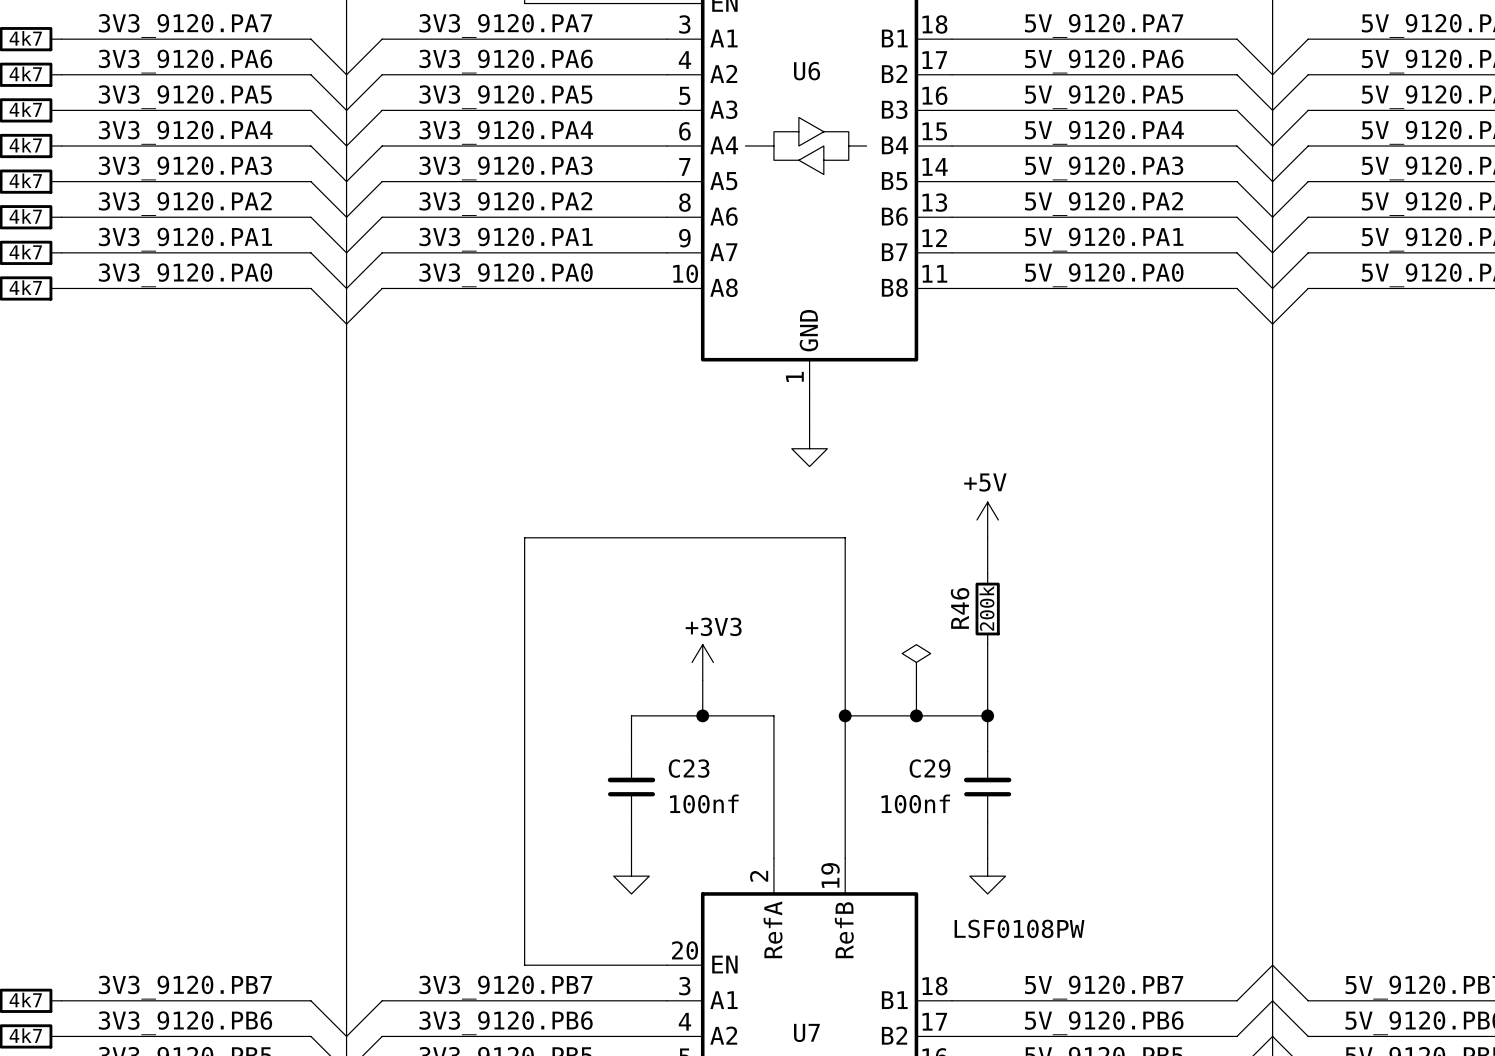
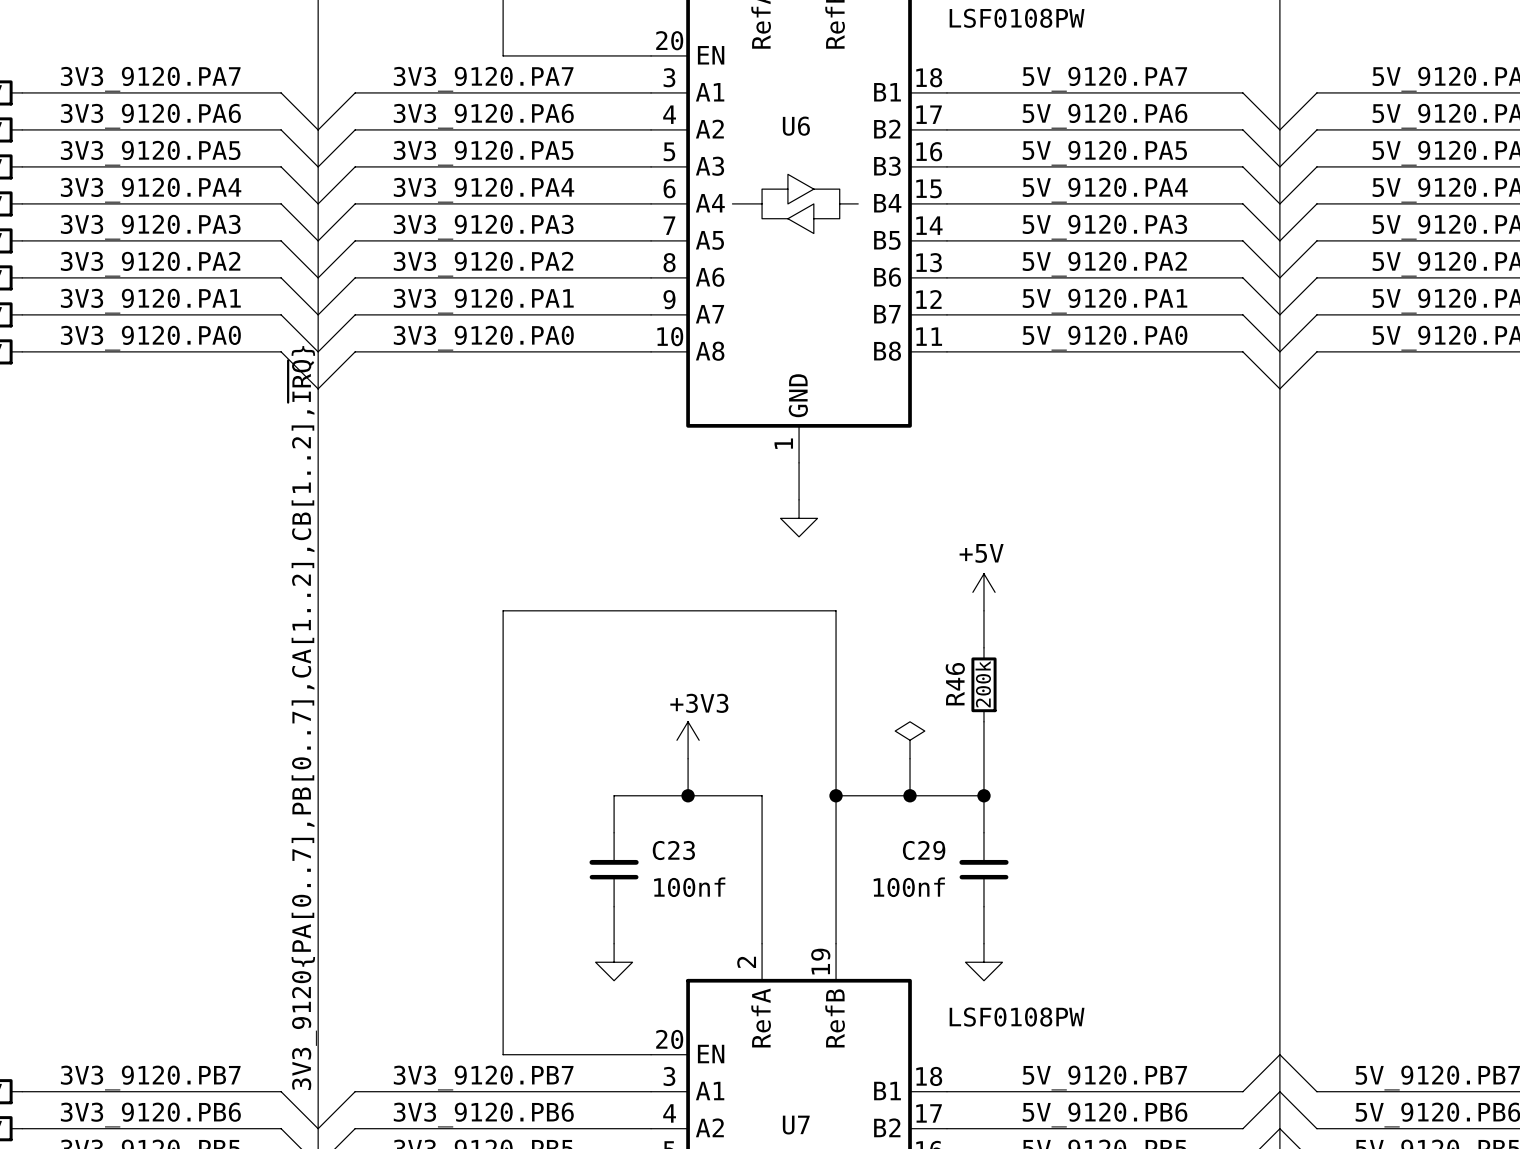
label: none -> 3V3_9120{PA[0..7],PB[0..7],CA[1..2],CB[1..2],~{IRQ}} (302, 718)

